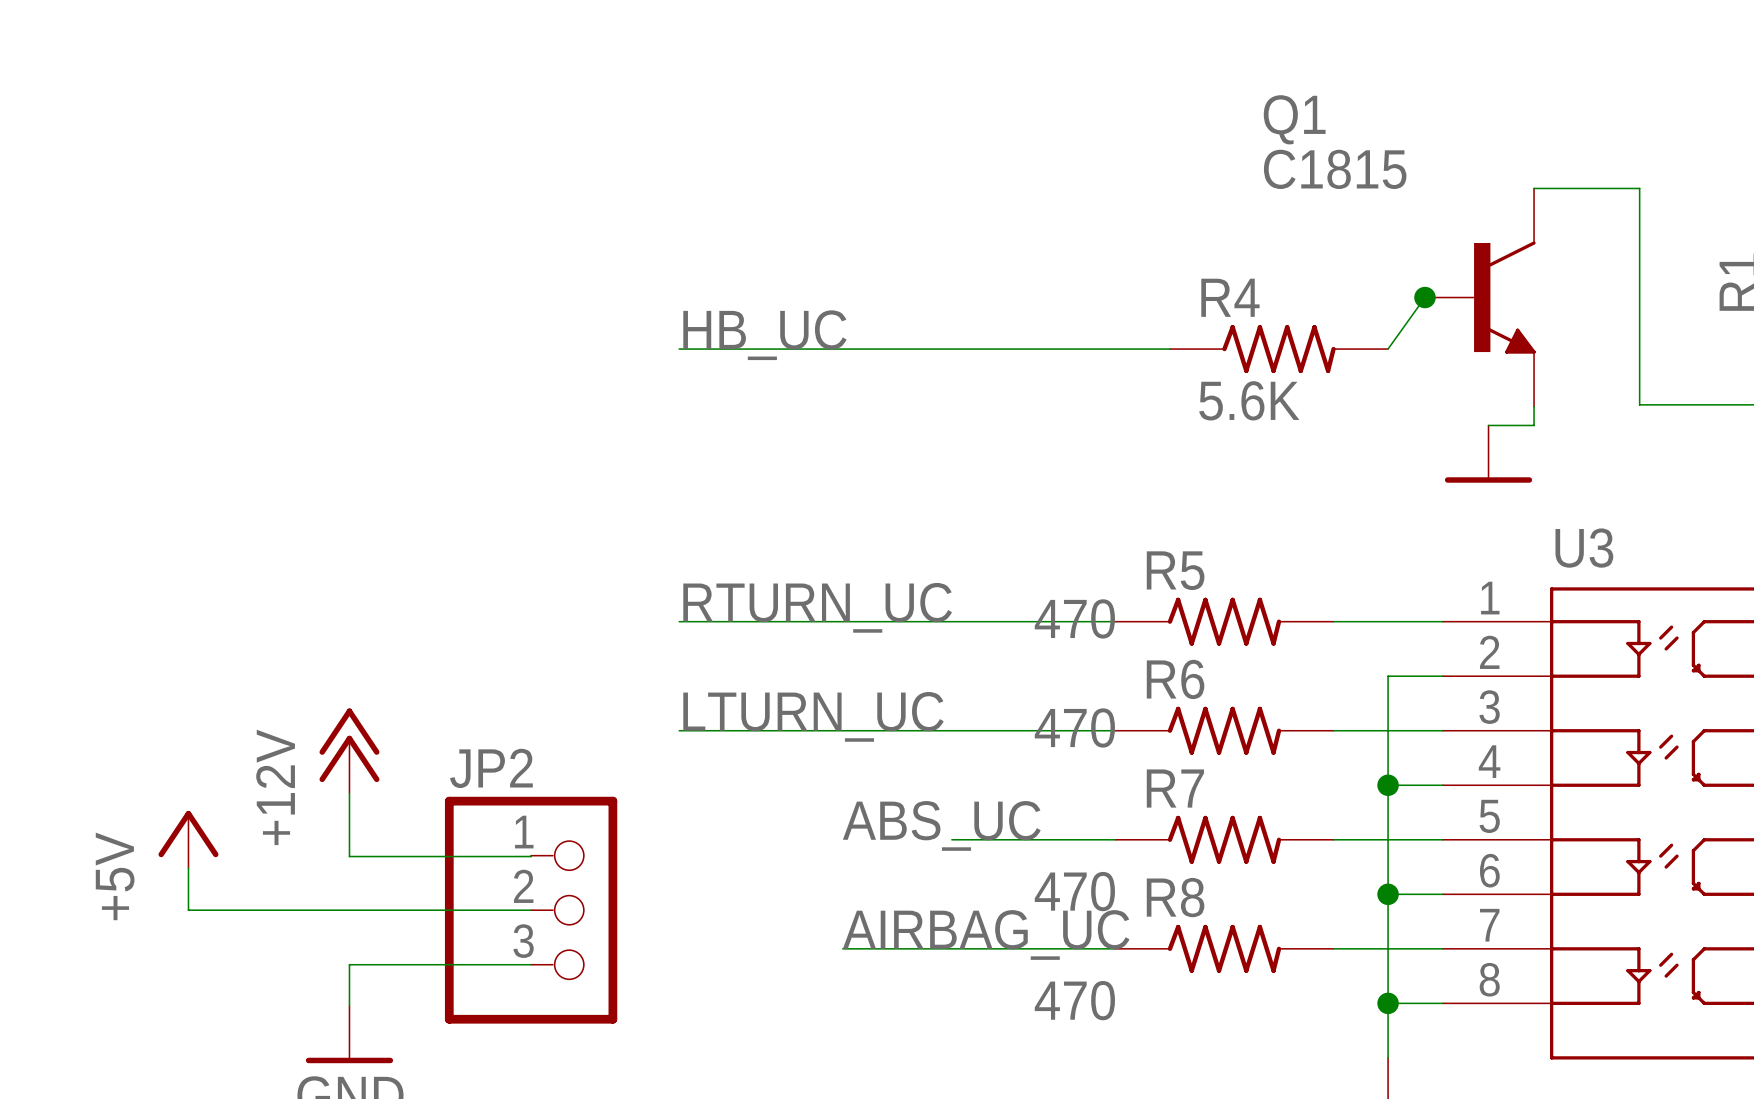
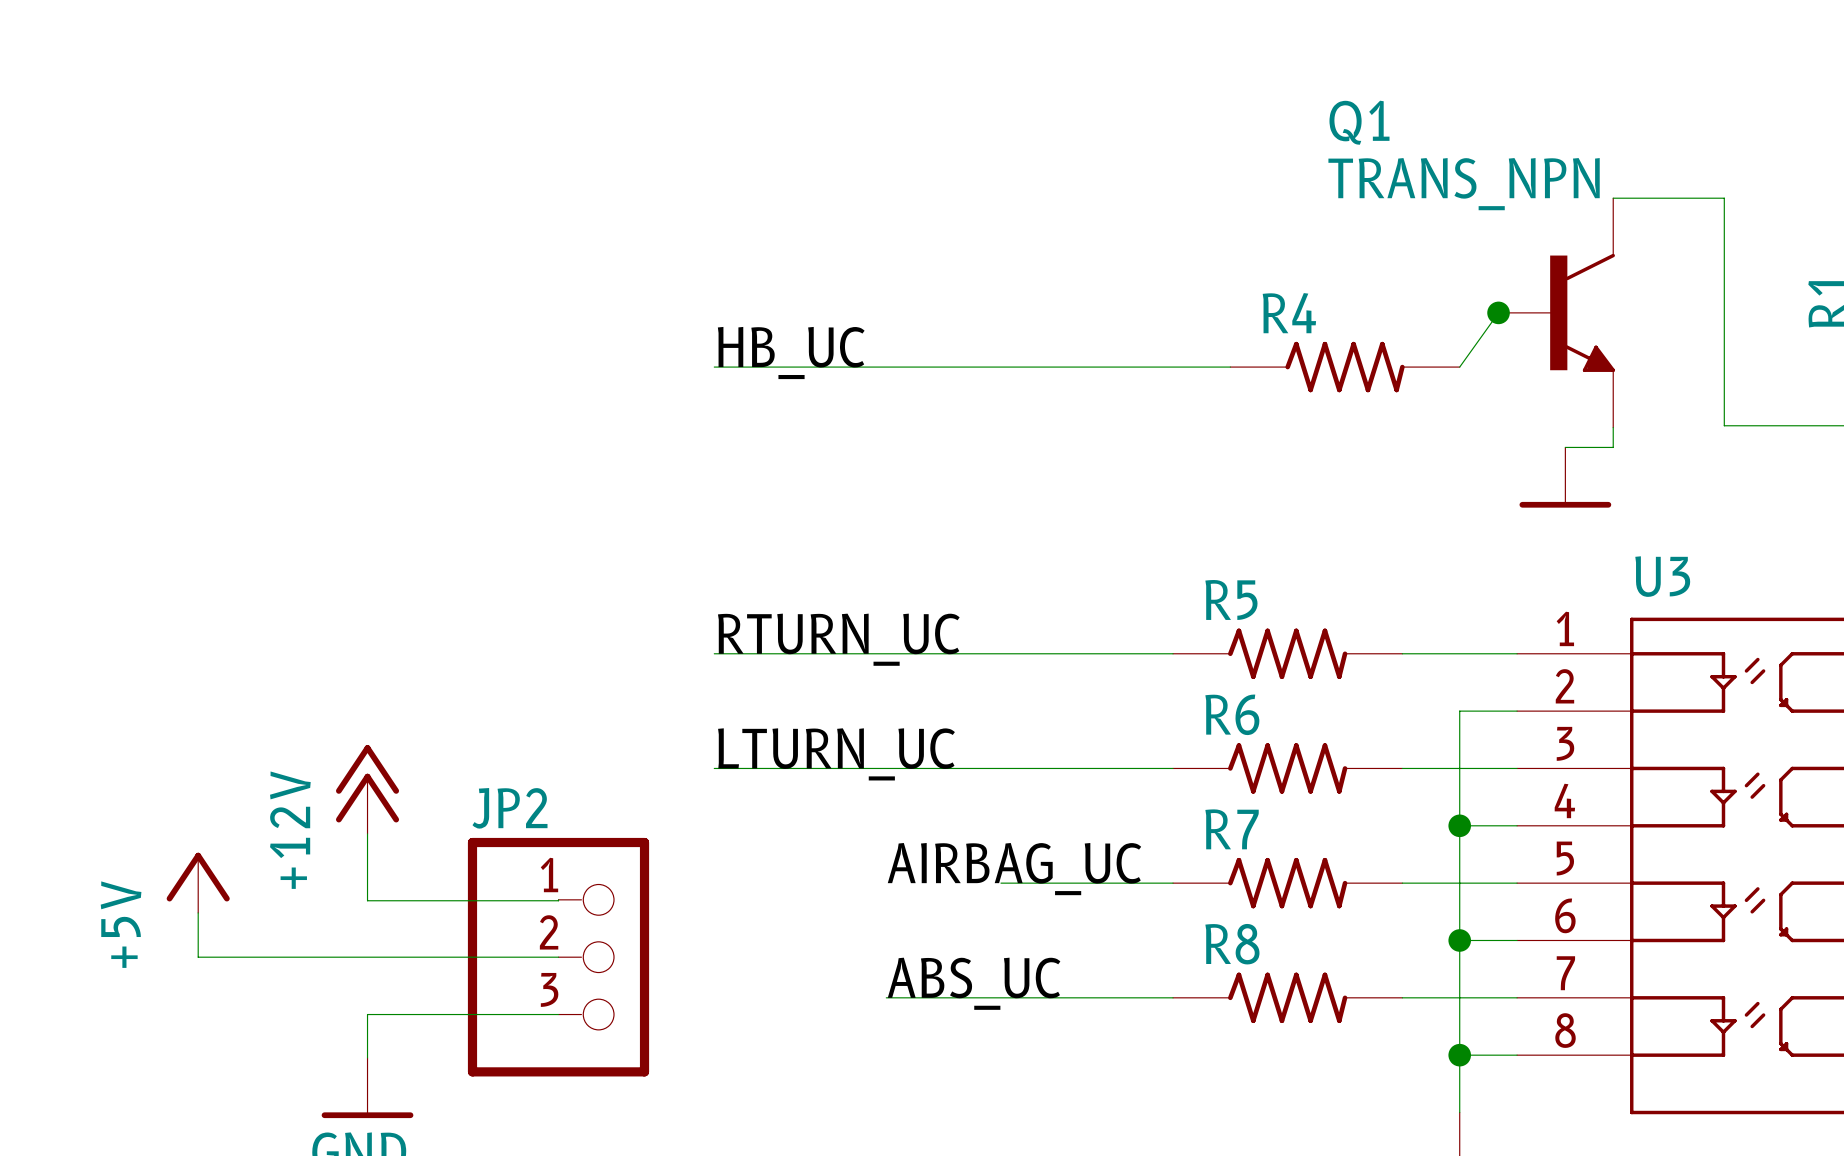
Q1 value: C1815 (1335, 169) -> TRANS_NPN (1464, 184)
R4 value: 5.6K (1249, 400) -> none
R5 value: 470 (1074, 618) -> none
R6 value: 470 (1074, 727) -> none
label: ABS_UC (941, 825) -> AIRBAG_UC (1014, 869)
R7 value: 470 (1074, 891) -> none
label: AIRBAG_UC (986, 934) -> ABS_UC (974, 983)
R8 value: 470 (1074, 1000) -> none

